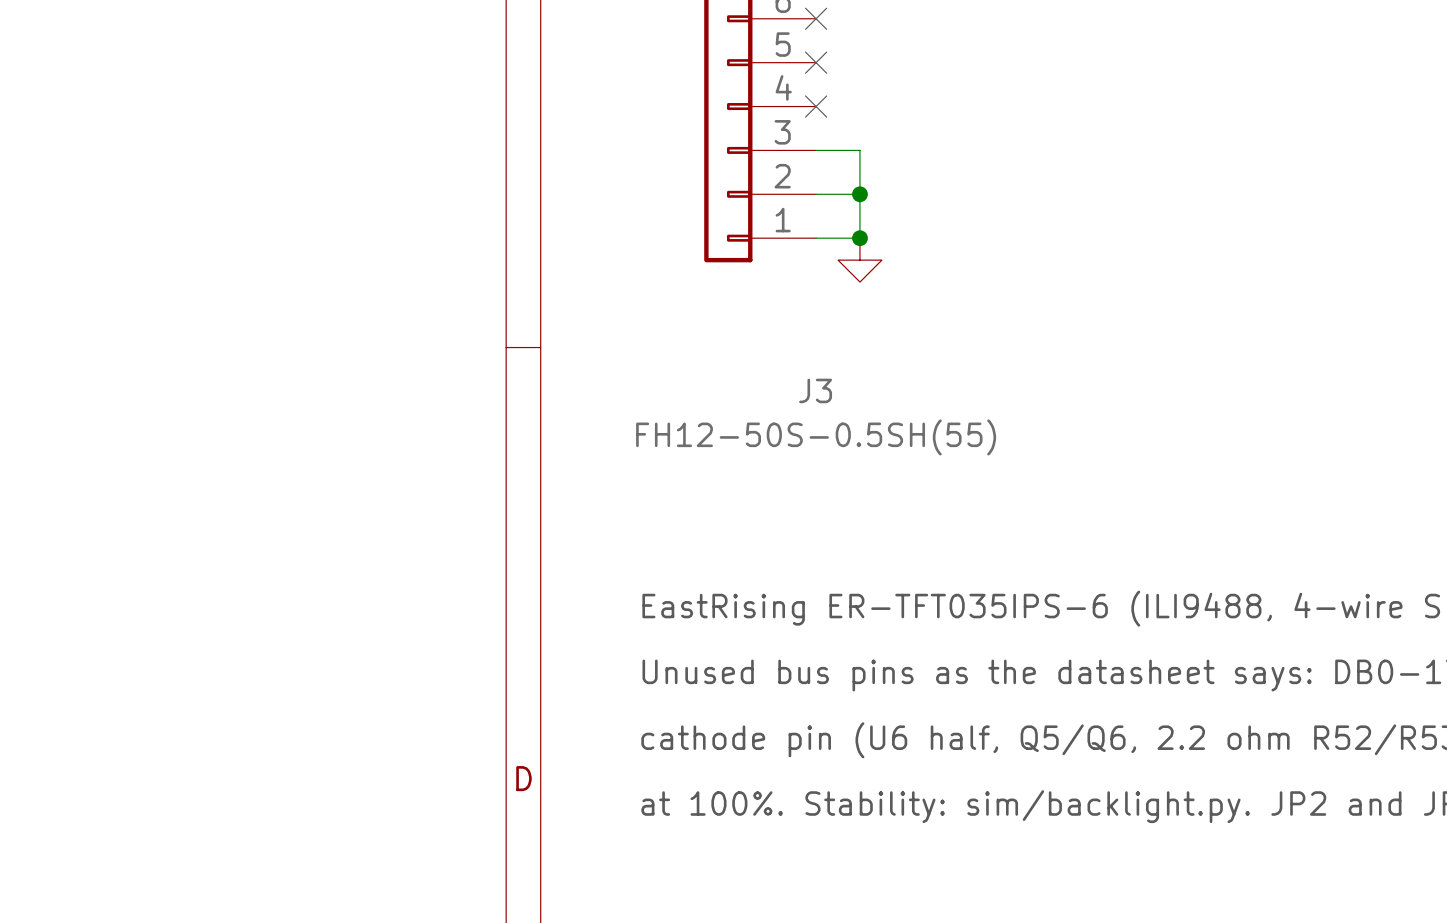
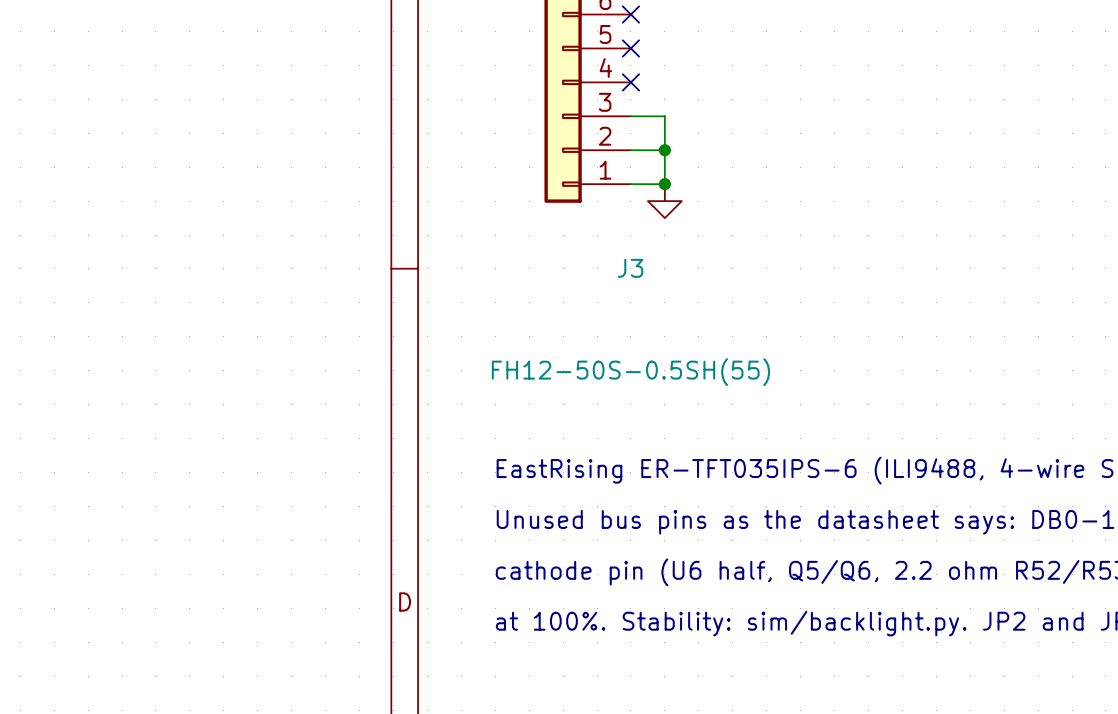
J3 name position: J3 (815, 390) -> J3 (630, 268)
J3 value position: FH12-50S-0.5SH(55) (816, 437) -> FH12-50S-0.5SH(55) (630, 372)

